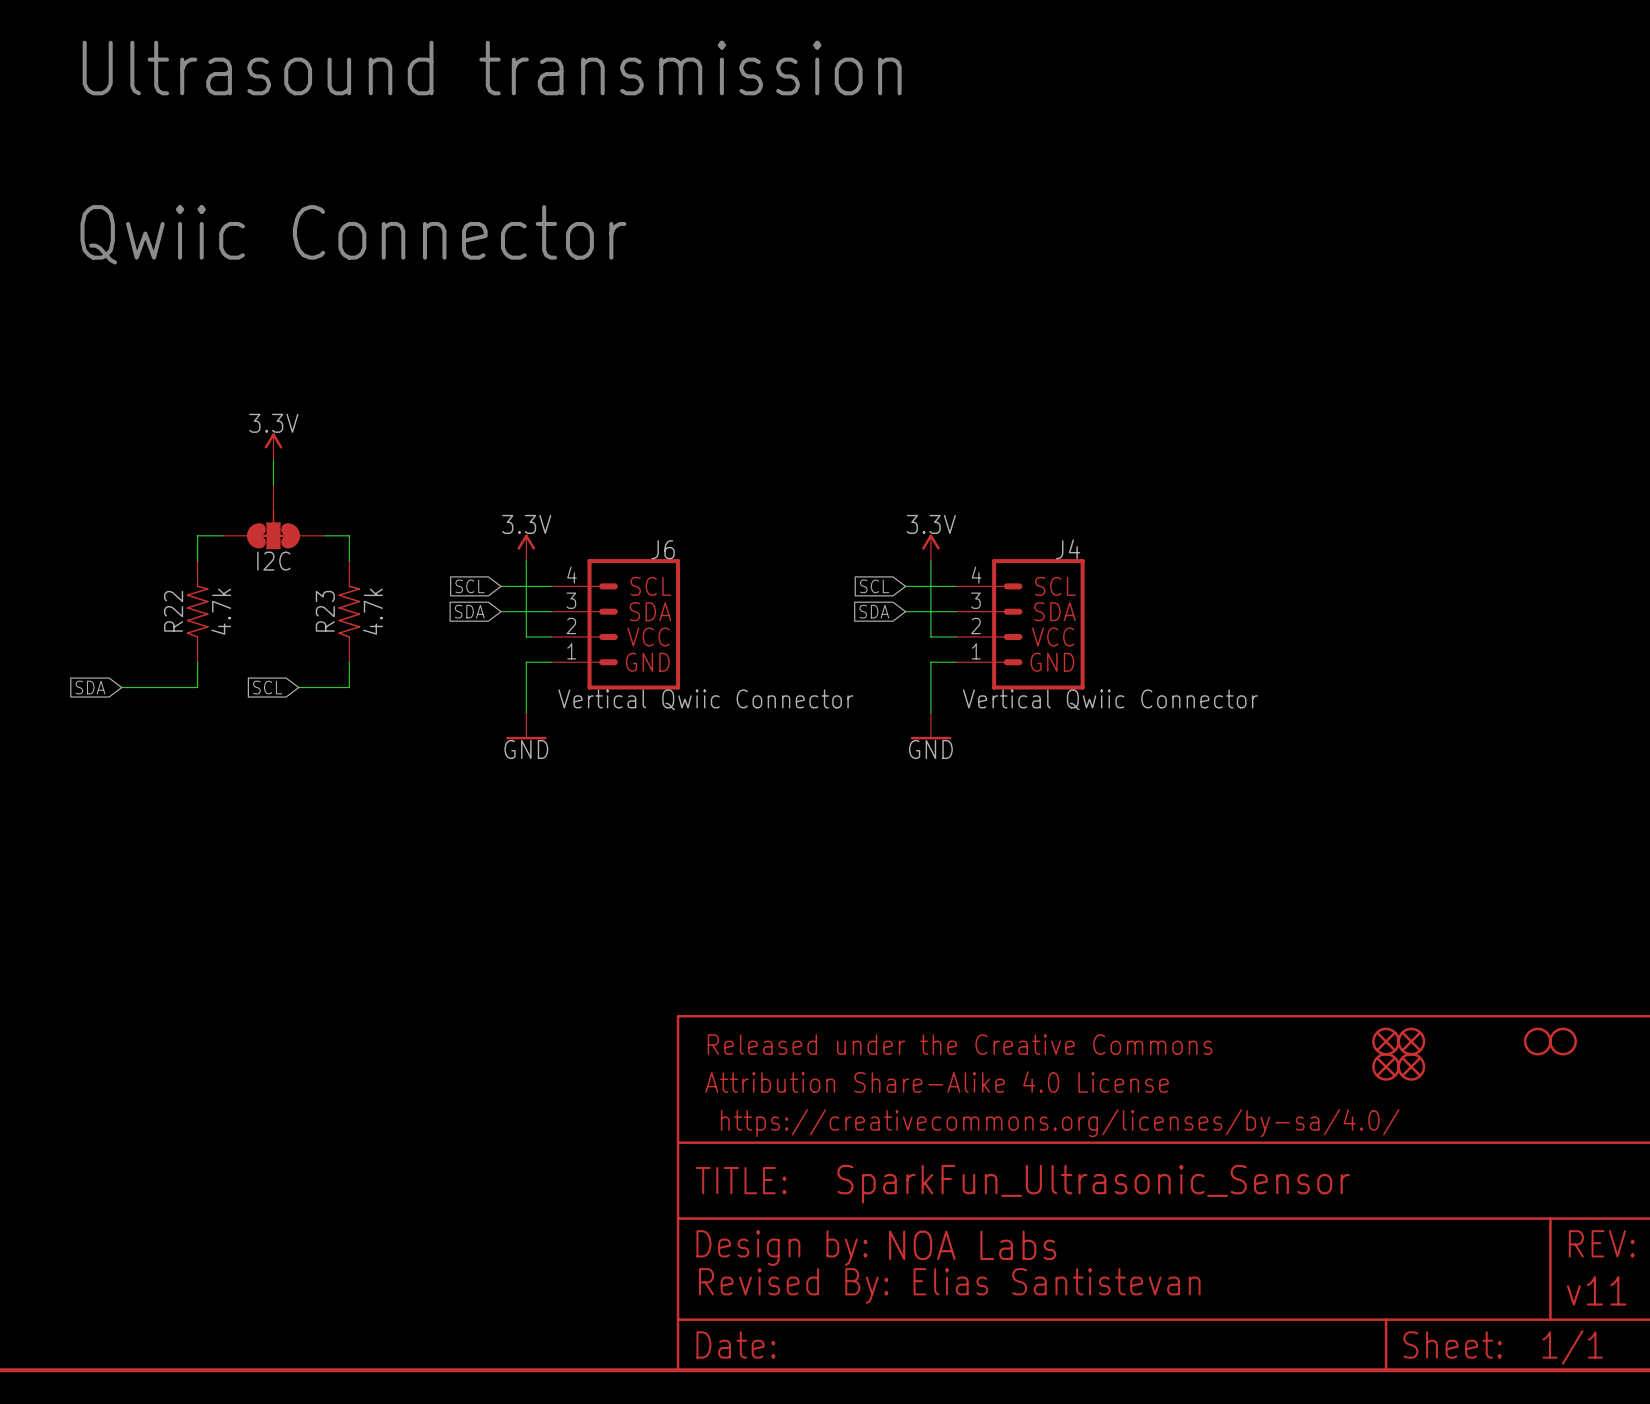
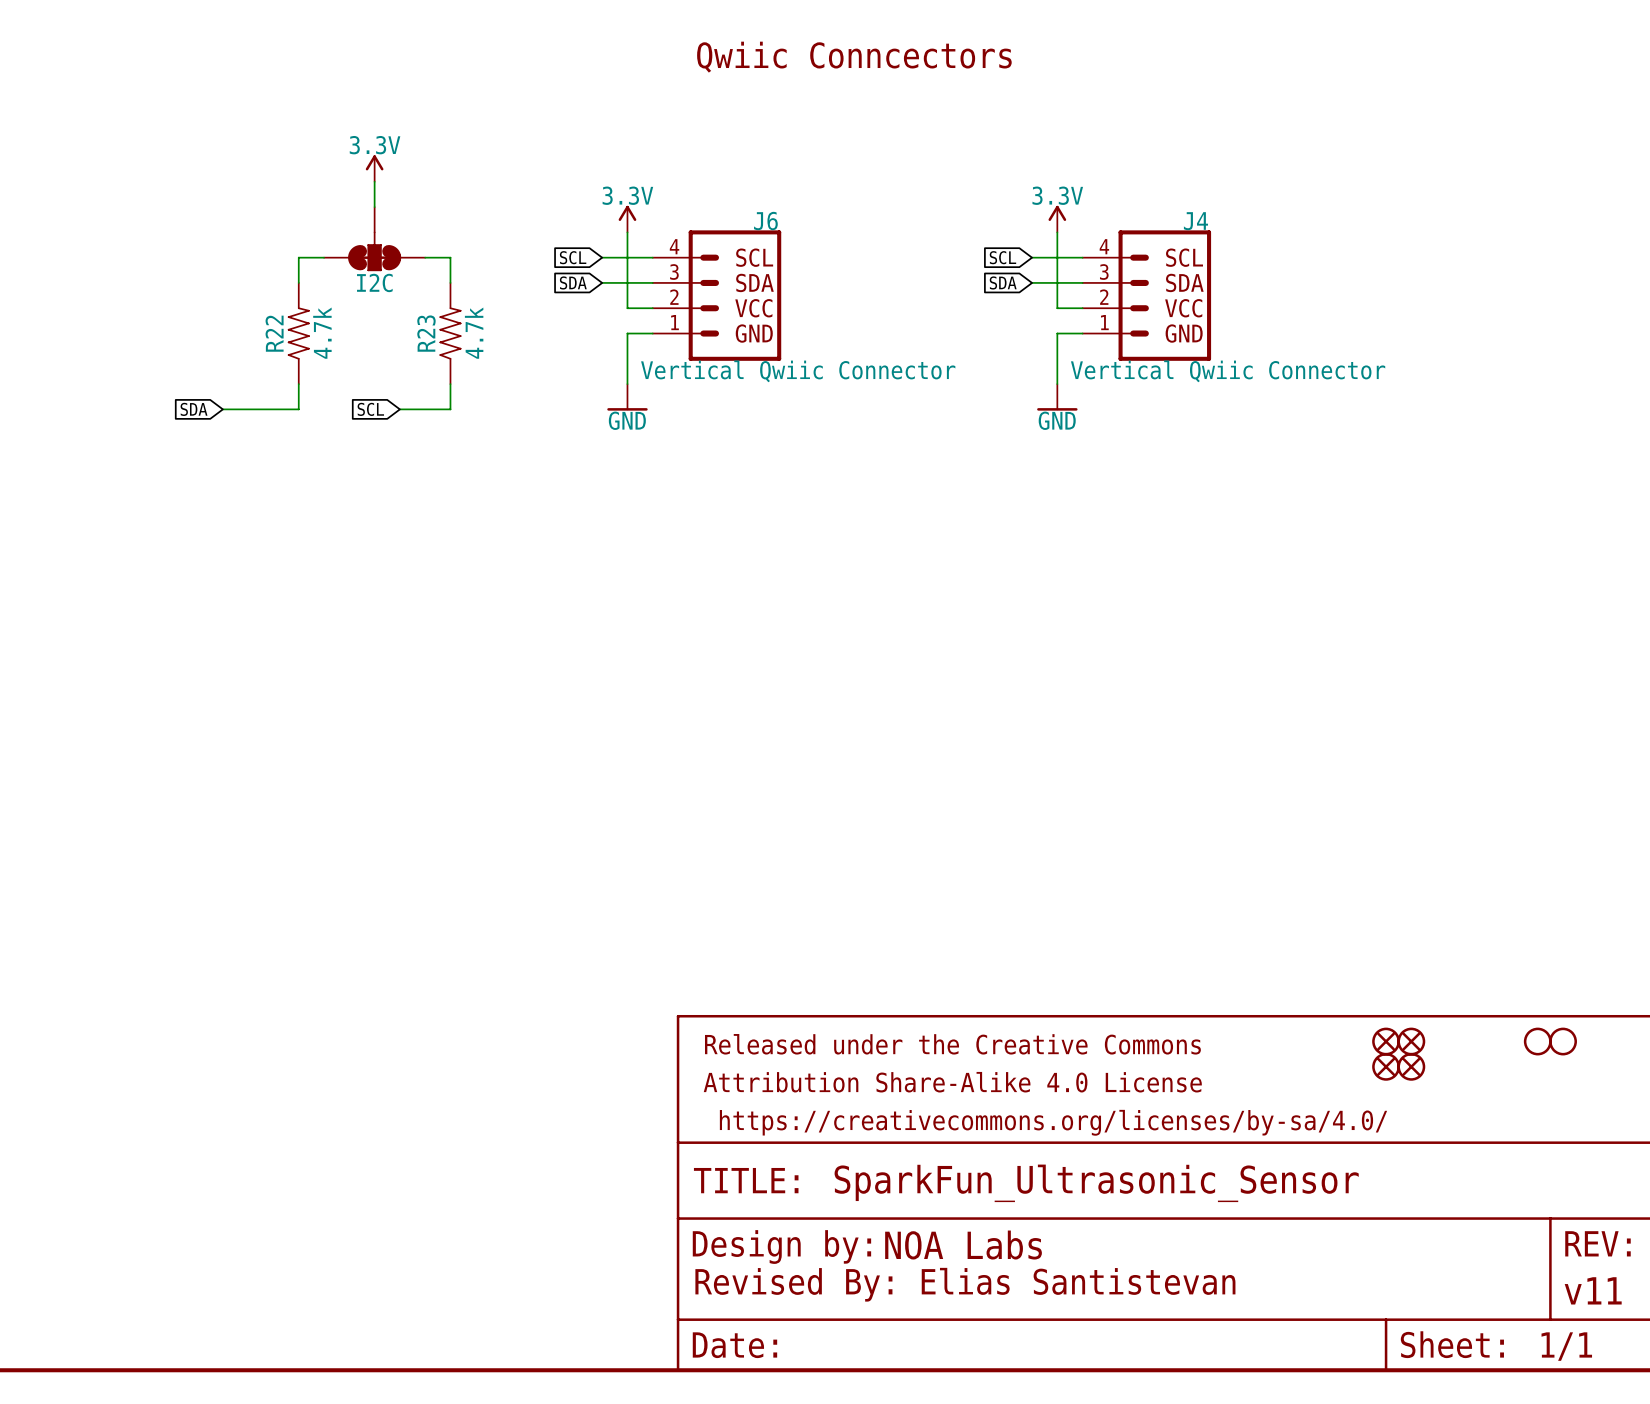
text: none -> Qwiic Conncectors (854, 57)
text: Ultrasound transmission (492, 68) -> none
power symbol: none -> 3.3V (374, 168)
wire: none -> (374, 181) (374, 207)
power symbol: none -> 3.3V (627, 219)
power symbol: none -> 3.3V (1057, 219)
wire: none -> (627, 232) (627, 308) (652, 308)
wire: none -> (1057, 232) (1057, 308) (1082, 308)
text: Qwiic Connector (353, 234) -> none
wire: none -> (324, 257) (298, 257) (298, 282)
wire: none -> (425, 257) (450, 257) (450, 282)
global label: none -> SCL (573, 257)
wire: none -> (602, 257) (652, 257)
global label: none -> SCL (1002, 257)
wire: none -> (1032, 257) (1082, 257)
global label: none -> SDA (573, 282)
wire: none -> (602, 282) (652, 282)
global label: none -> SDA (1003, 282)
wire: none -> (1032, 282) (1082, 282)
wire: none -> (652, 333) (627, 333) (627, 384)
wire: none -> (1082, 333) (1057, 333) (1057, 384)
wire: none -> (298, 384) (298, 409) (222, 409)
wire: none -> (450, 384) (450, 409) (399, 409)
power symbol: none -> GND (627, 397)
power symbol: none -> GND (1057, 397)
global label: none -> SDA (194, 409)
global label: none -> SCL (370, 409)
power symbol: 3.3V (273, 446) -> none
wire: (273, 459) (273, 485) -> none
I2C position: (273, 517) -> (374, 239)
wire: (222, 535) (197, 535) (197, 561) -> none
wire: (324, 535) (349, 535) (349, 561) -> none
power symbol: 3.3V (526, 547) -> none
power symbol: 3.3V (930, 547) -> none
wire: (526, 561) (526, 636) (551, 636) -> none
wire: (930, 561) (930, 636) (956, 636) -> none
global label: SCL (470, 586) -> none
wire: (501, 586) (551, 586) -> none
global label: SCL (874, 586) -> none
wire: (905, 586) (956, 586) -> none
R22 position: (197, 611) -> (298, 333)
R23 position: (349, 611) -> (450, 333)
global label: SDA (469, 611) -> none
wire: (501, 611) (551, 611) -> none
global label: SDA (874, 611) -> none
wire: (905, 611) (956, 611) -> none
J6 position: (615, 624) -> (716, 295)
J4 position: (1020, 624) -> (1146, 295)
wire: (197, 662) (197, 687) (121, 687) -> none
wire: (349, 662) (349, 687) (298, 687) -> none
wire: (551, 662) (526, 662) (526, 712) -> none
wire: (956, 662) (930, 662) (930, 712) -> none
global label: SDA (90, 687) -> none
global label: SCL (267, 687) -> none
power symbol: GND (526, 726) -> none
power symbol: GND (930, 726) -> none

